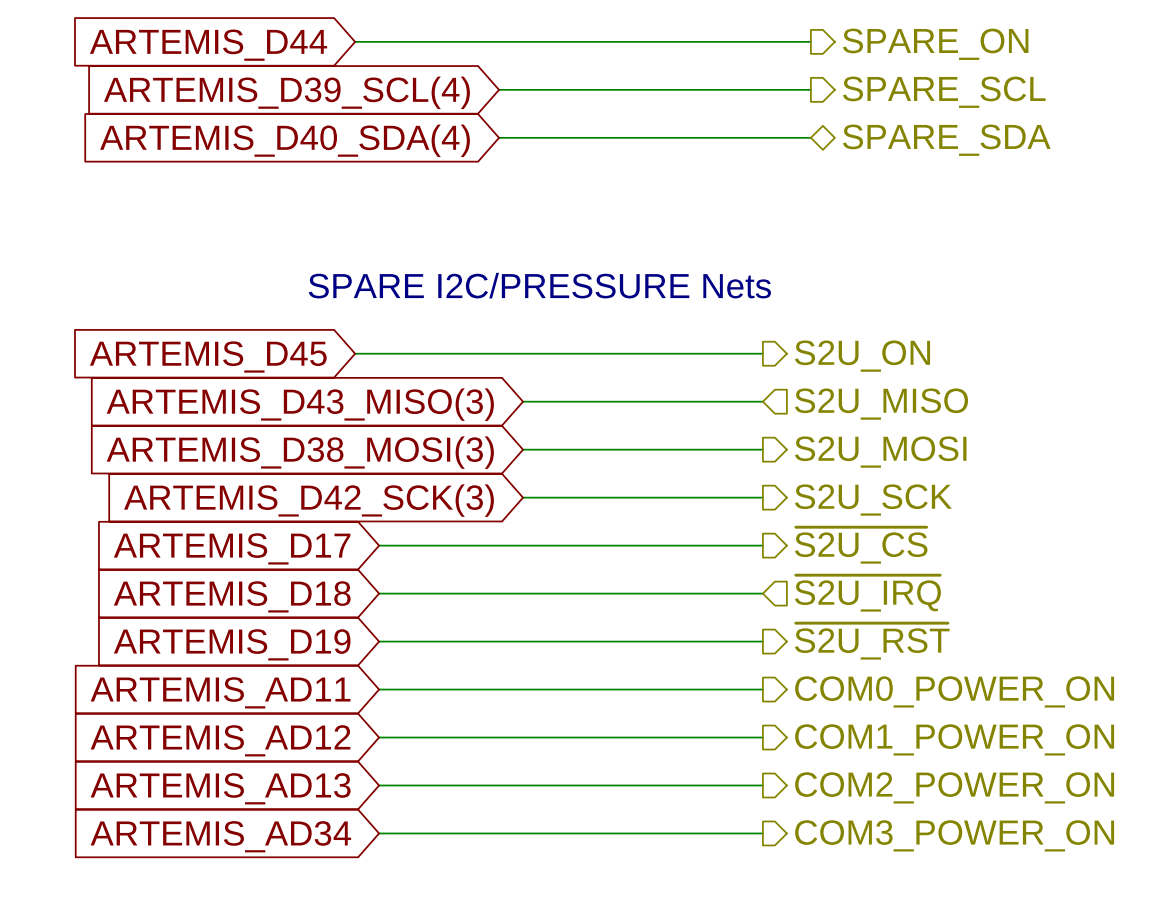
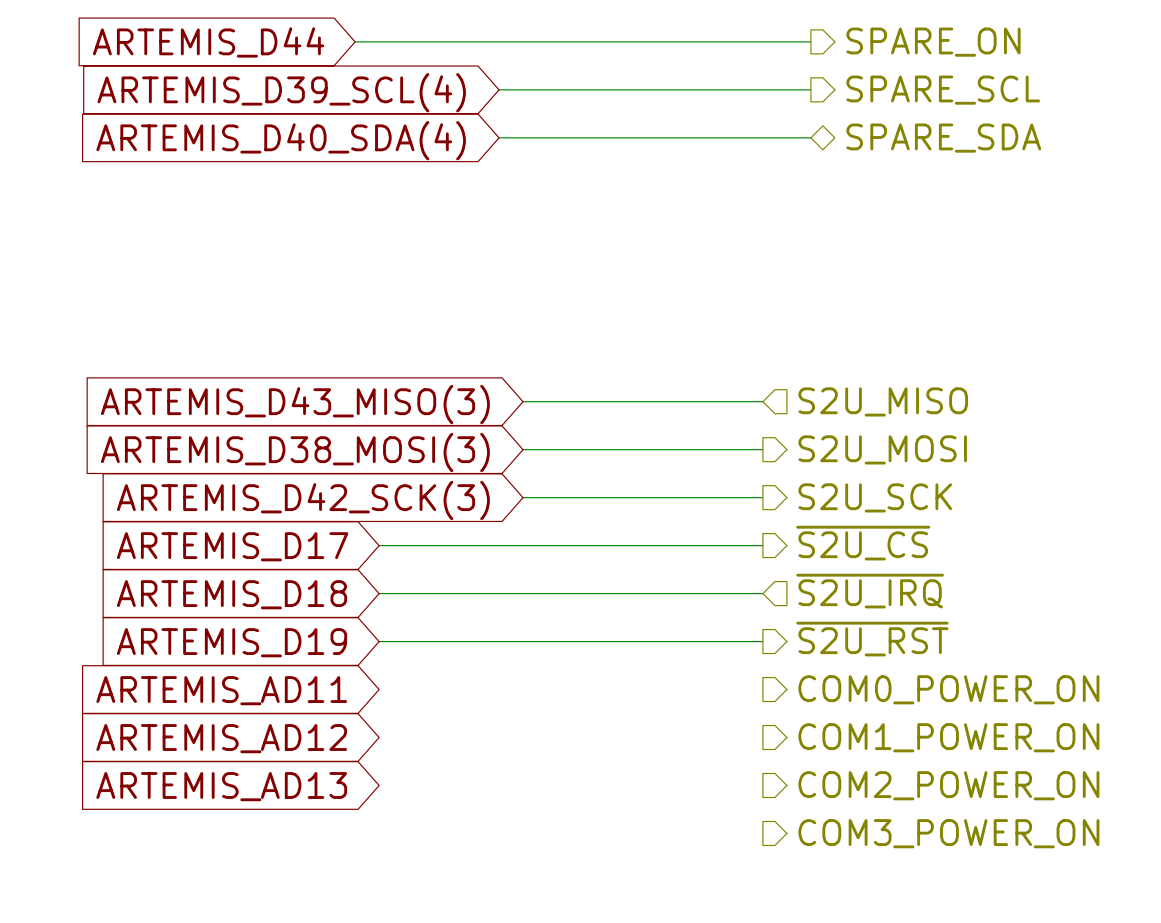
text: SPARE I2C/PRESSURE Nets (539, 285) -> none
wire: (355, 353) (762, 353) -> none
hierarchical label: S2U_ON (862, 356) -> none
global label: ARTEMIS_D45 (208, 357) -> none
wire: (379, 689) (762, 689) -> none
wire: (379, 737) (762, 737) -> none
wire: (379, 785) (762, 785) -> none
wire: (379, 833) (762, 833) -> none
global label: ARTEMIS_AD34 (220, 836) -> none

